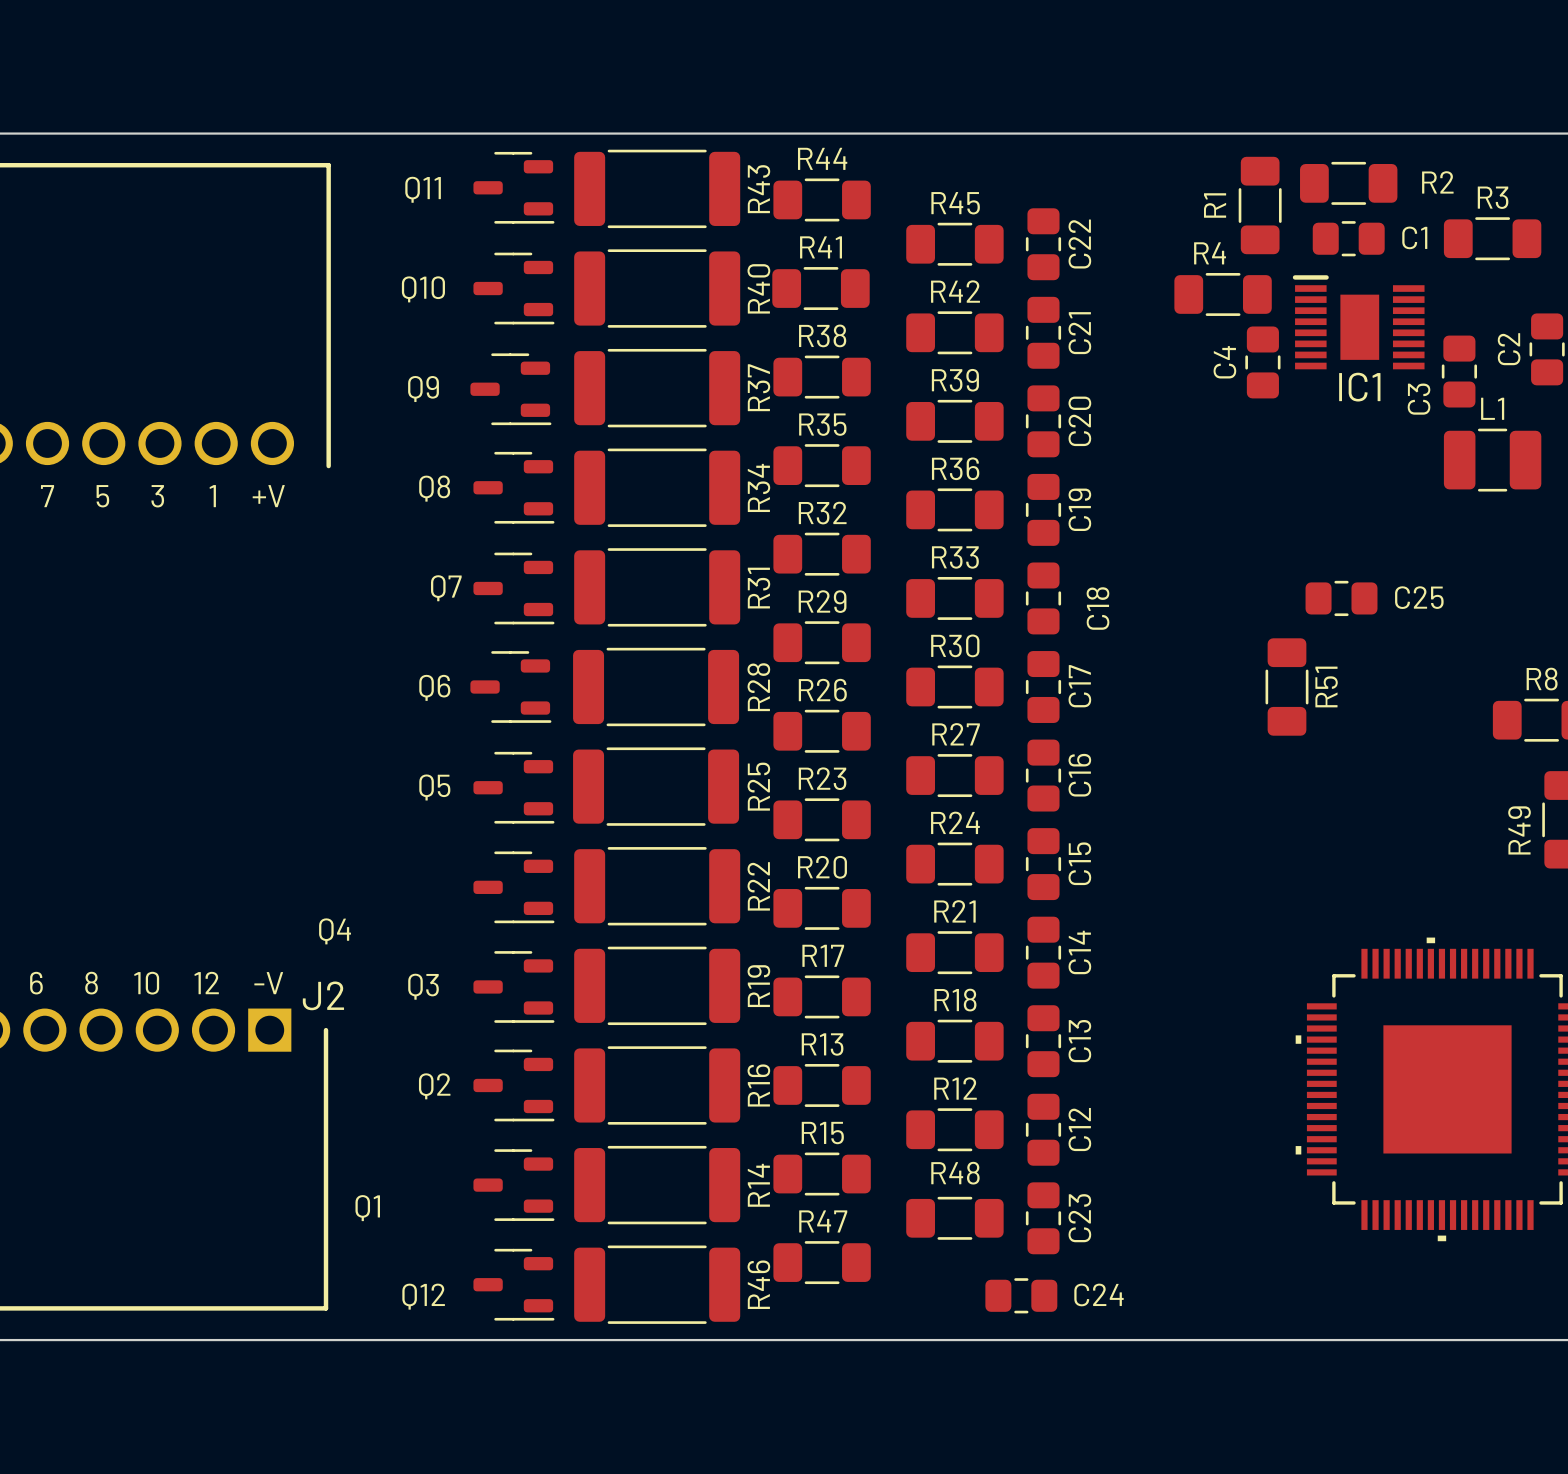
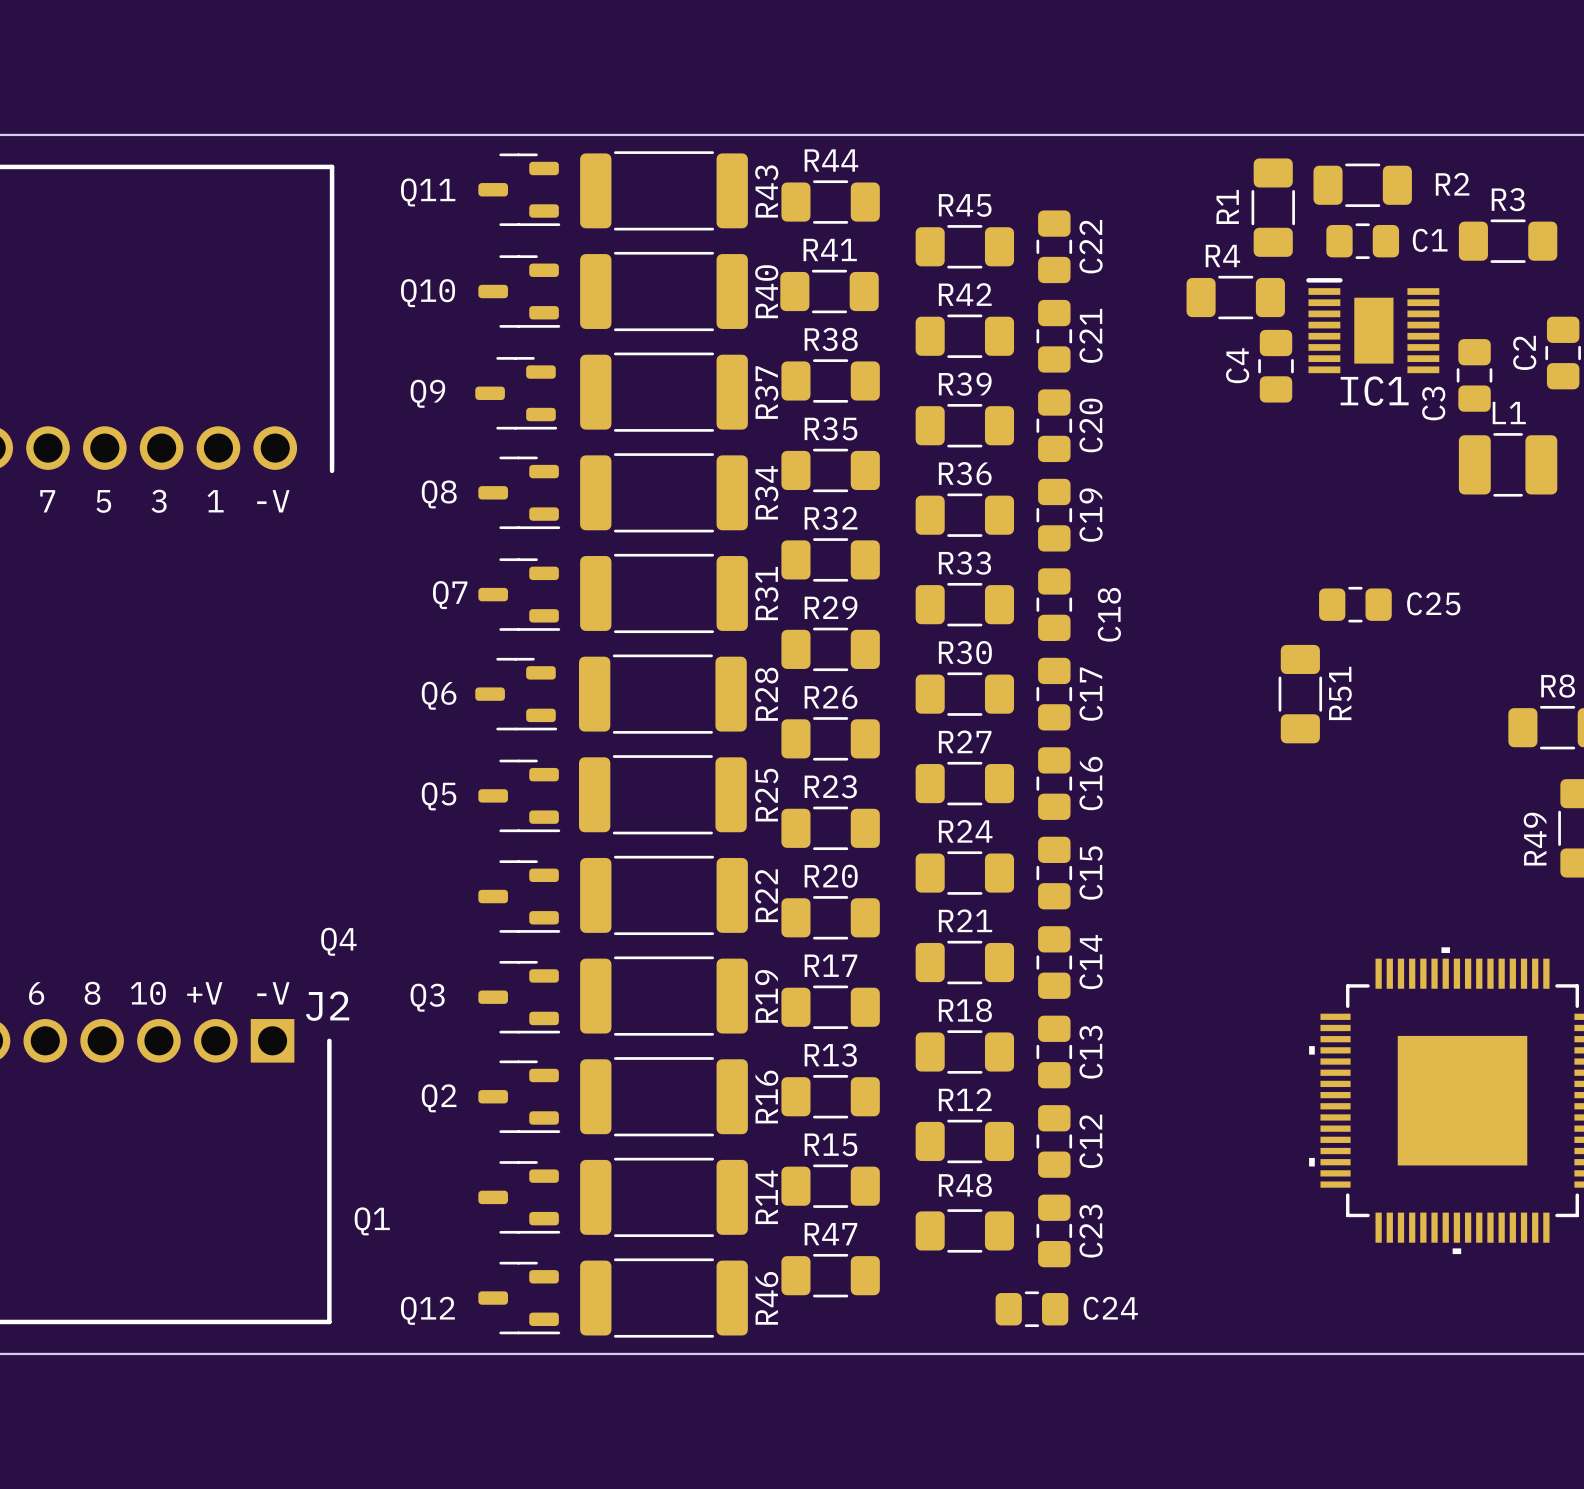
text: +V (268, 496) -> -V (273, 501)
text: 12 (206, 983) -> +V (204, 993)

